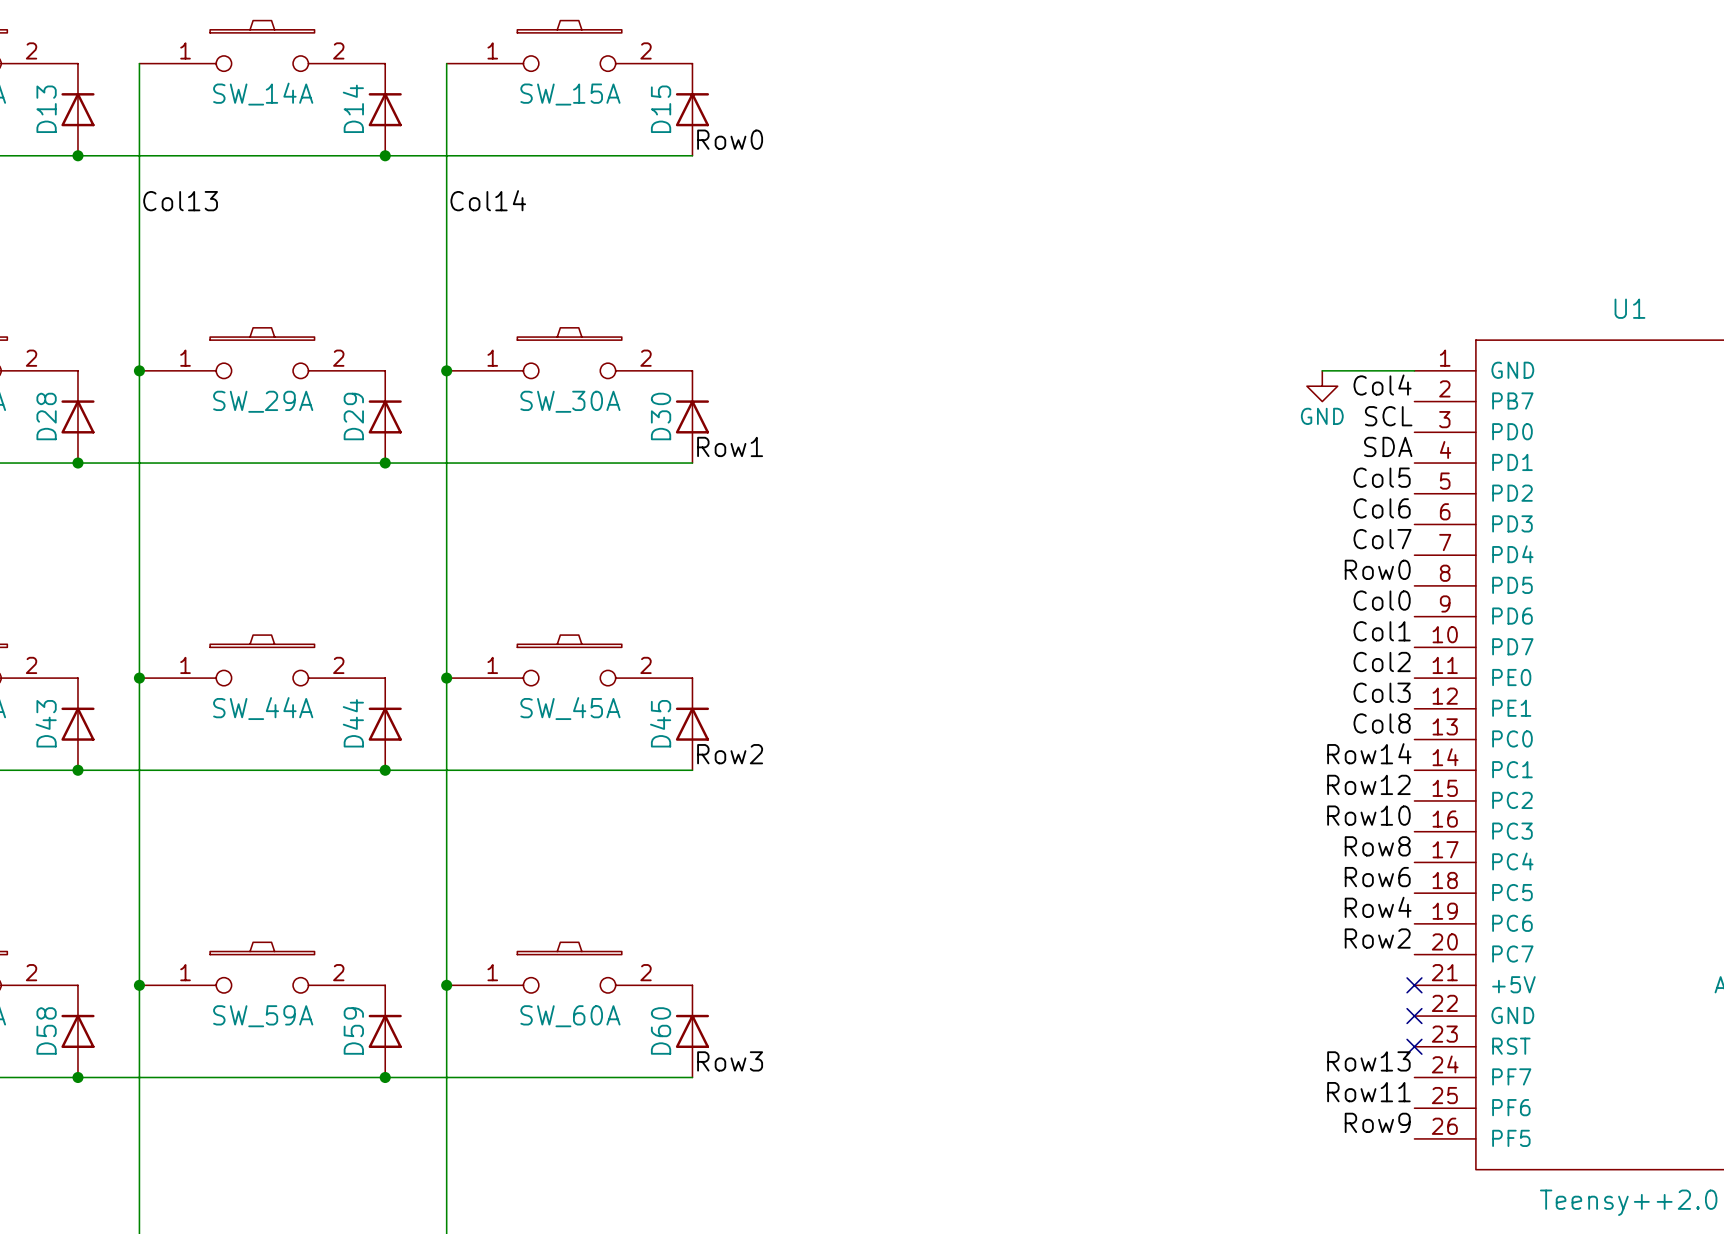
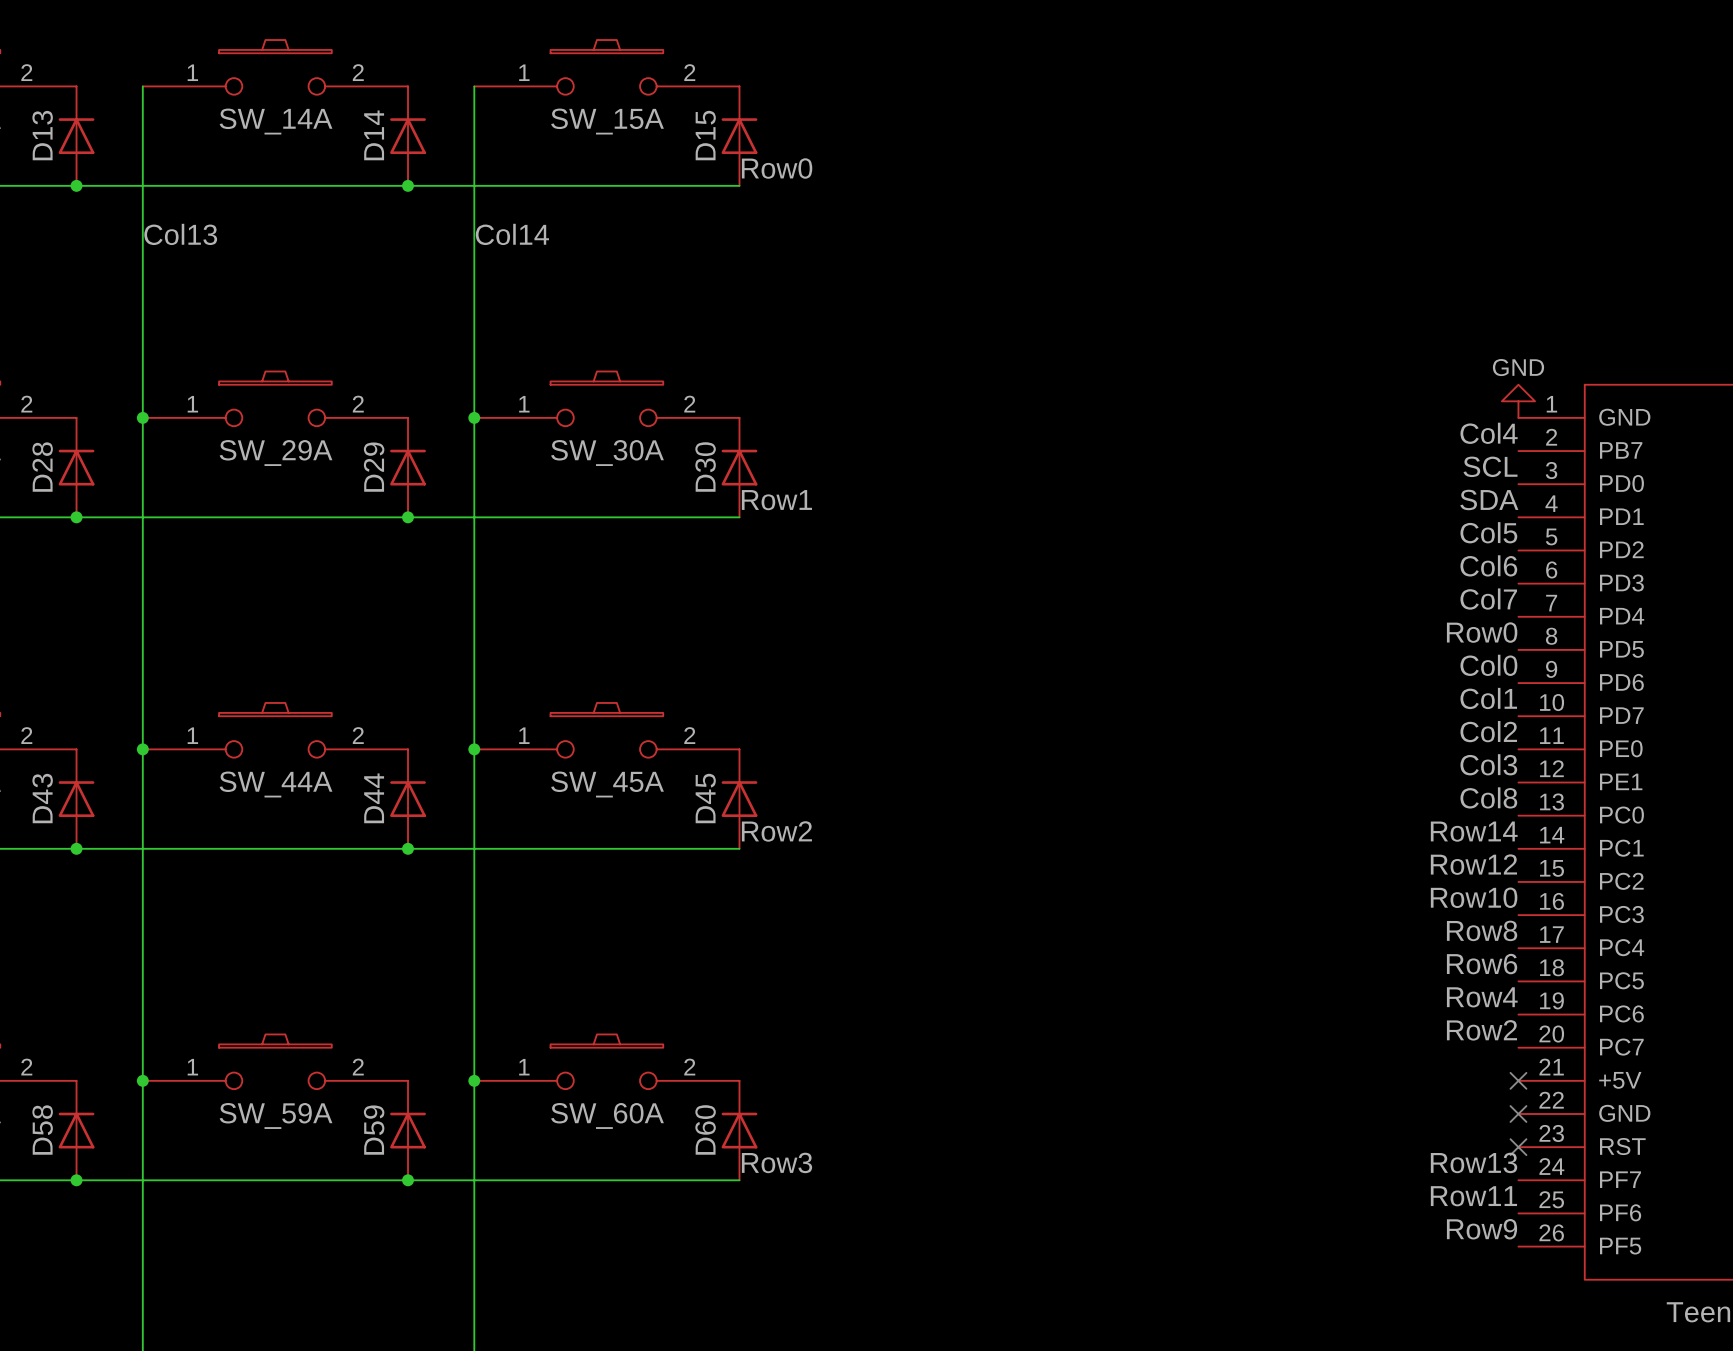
wire: (1322, 370) (1414, 370) -> none
power symbol rotation: 0° (1322, 386) -> 180° (1518, 401)
power symbol position: GND (1322, 386) -> GND (1518, 401)

